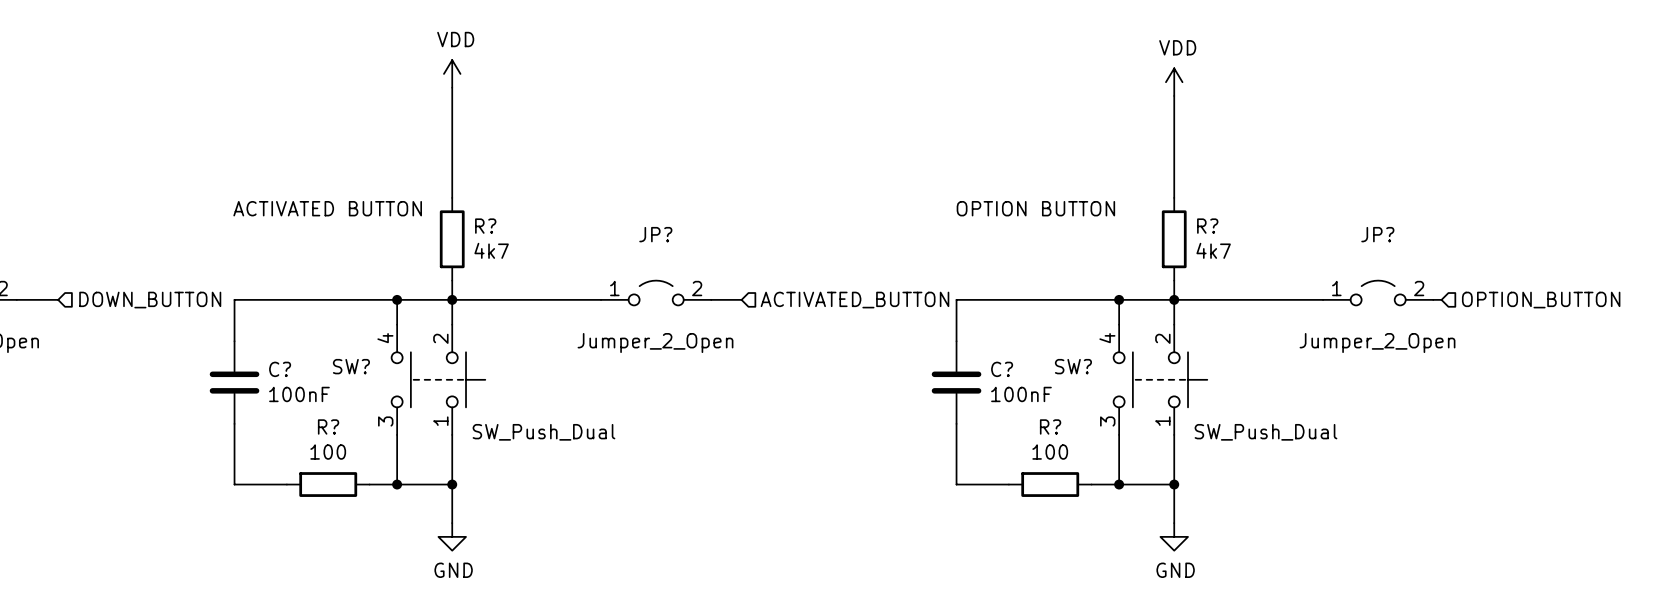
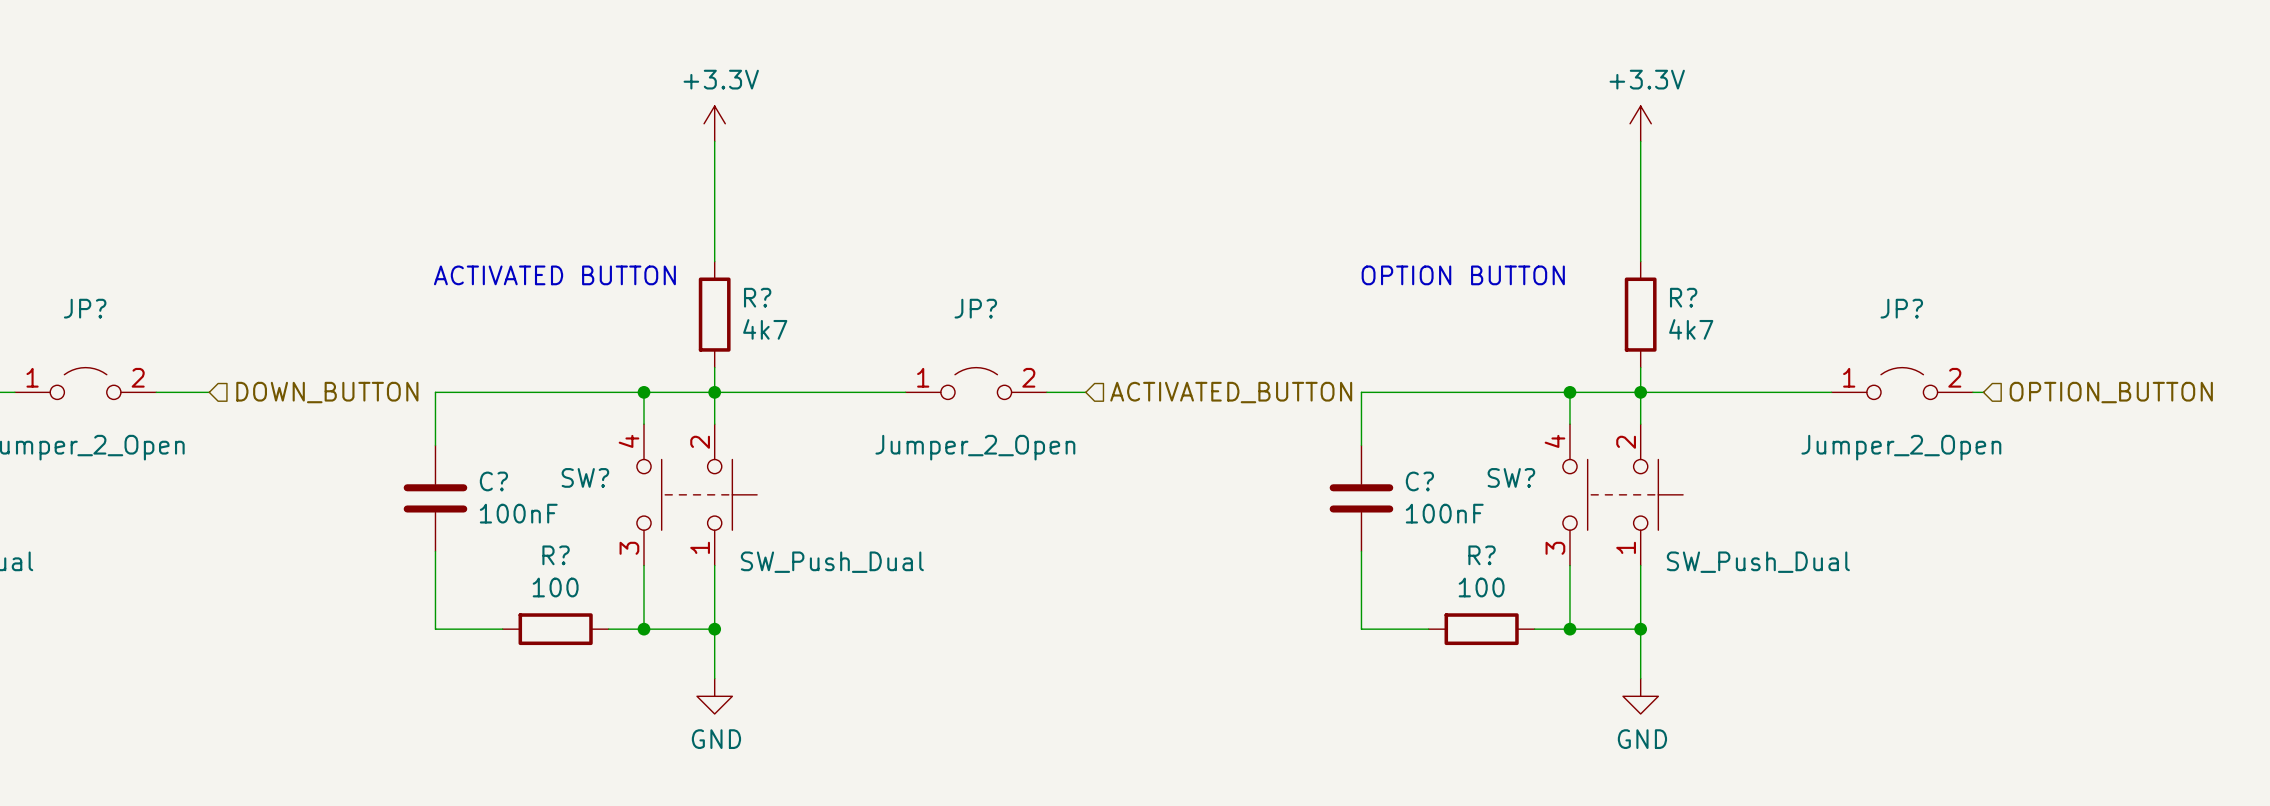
power symbol: VDD (452, 73) -> none
power symbol: VDD (1174, 82) -> +3.3V (1640, 123)
power symbol: none -> +3.3V (714, 123)

